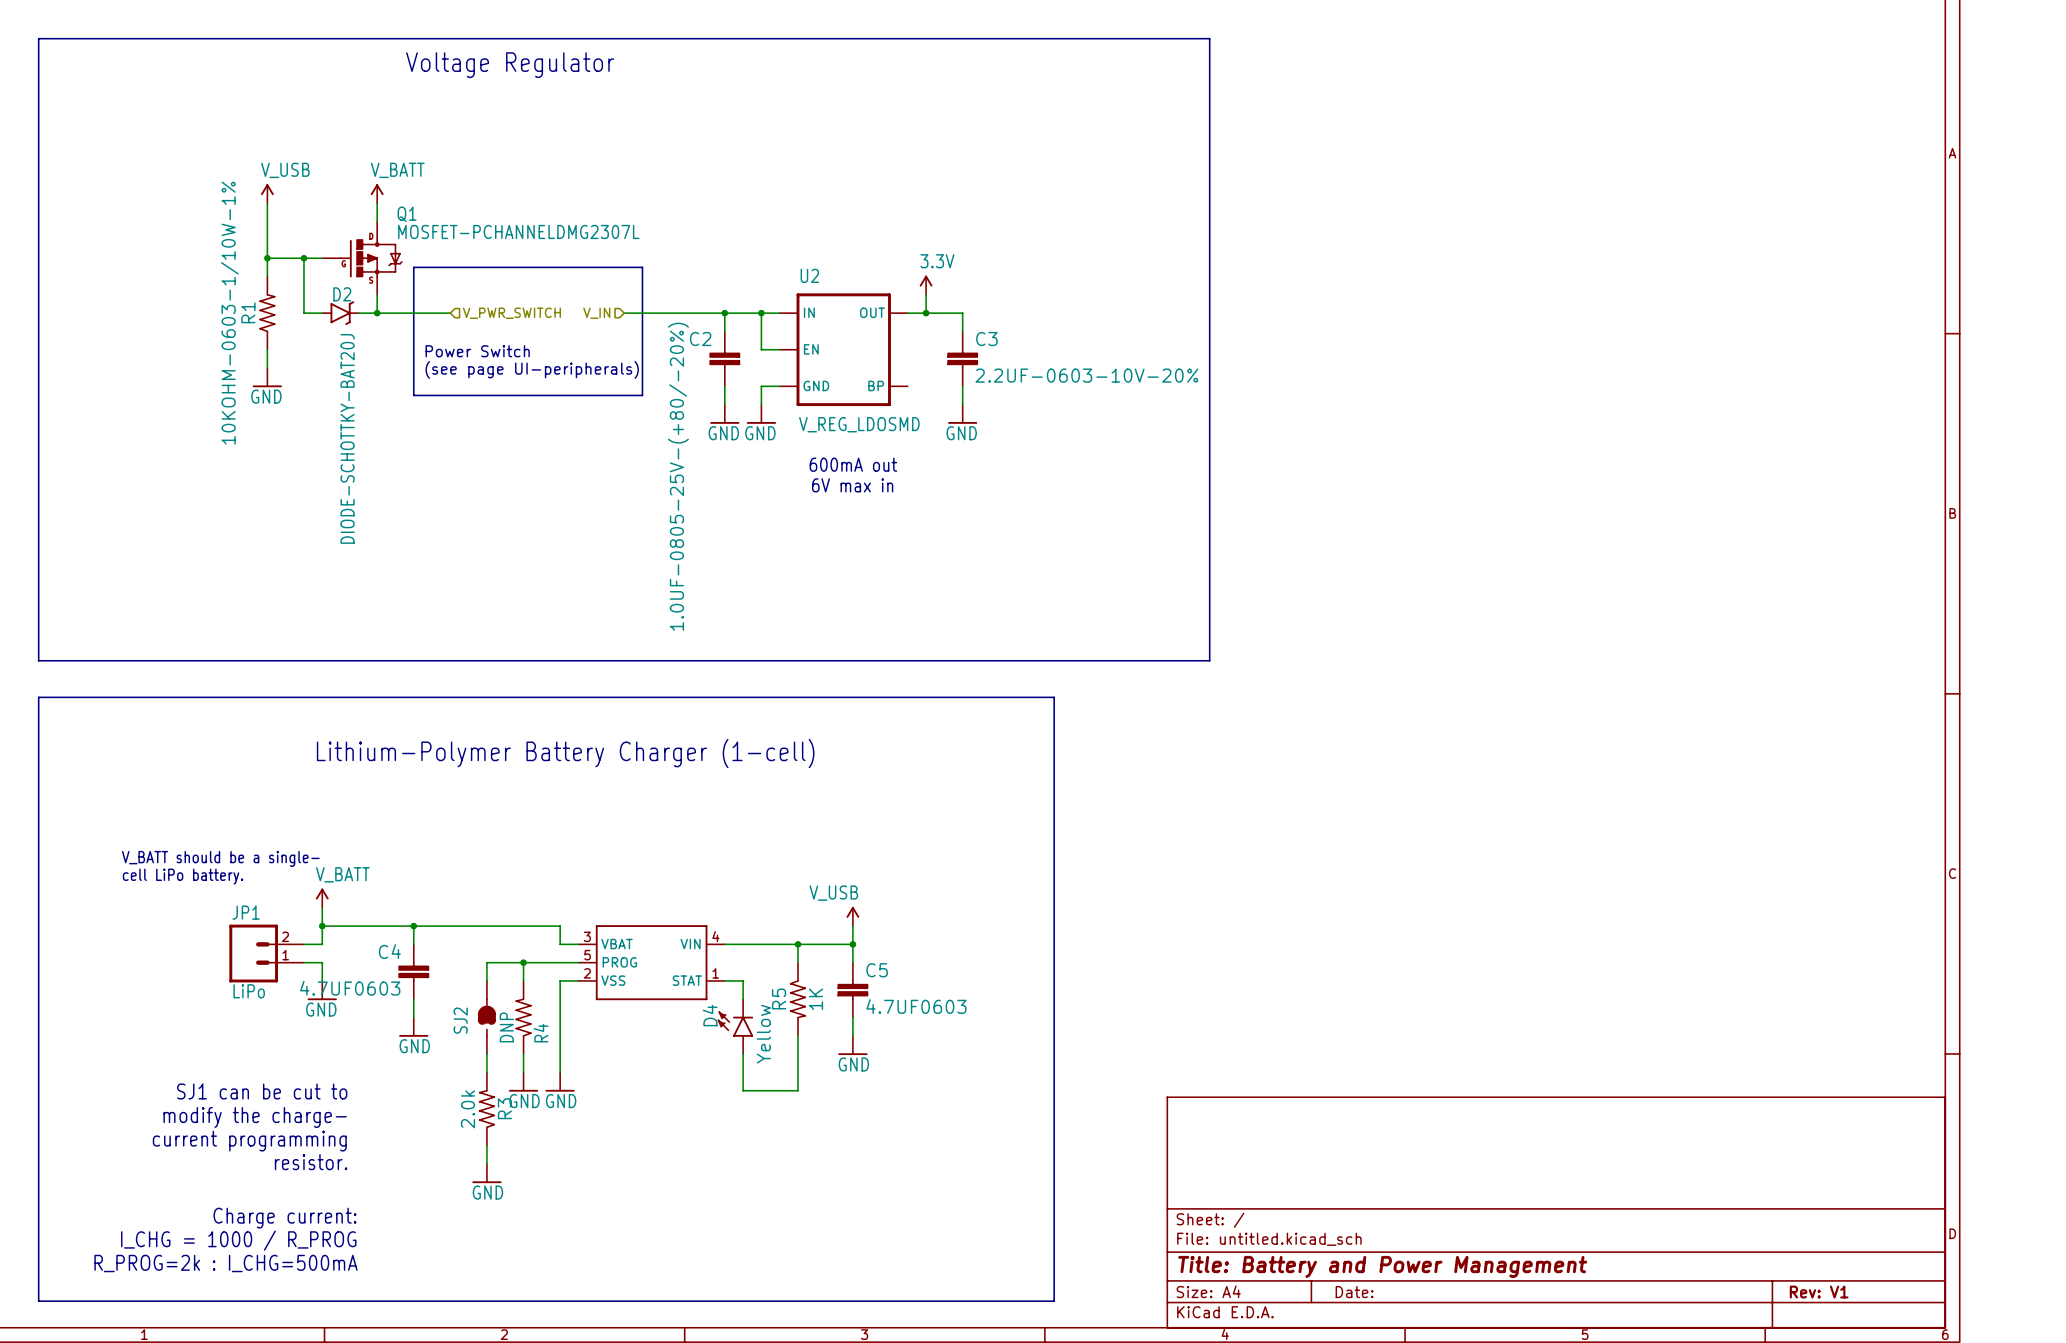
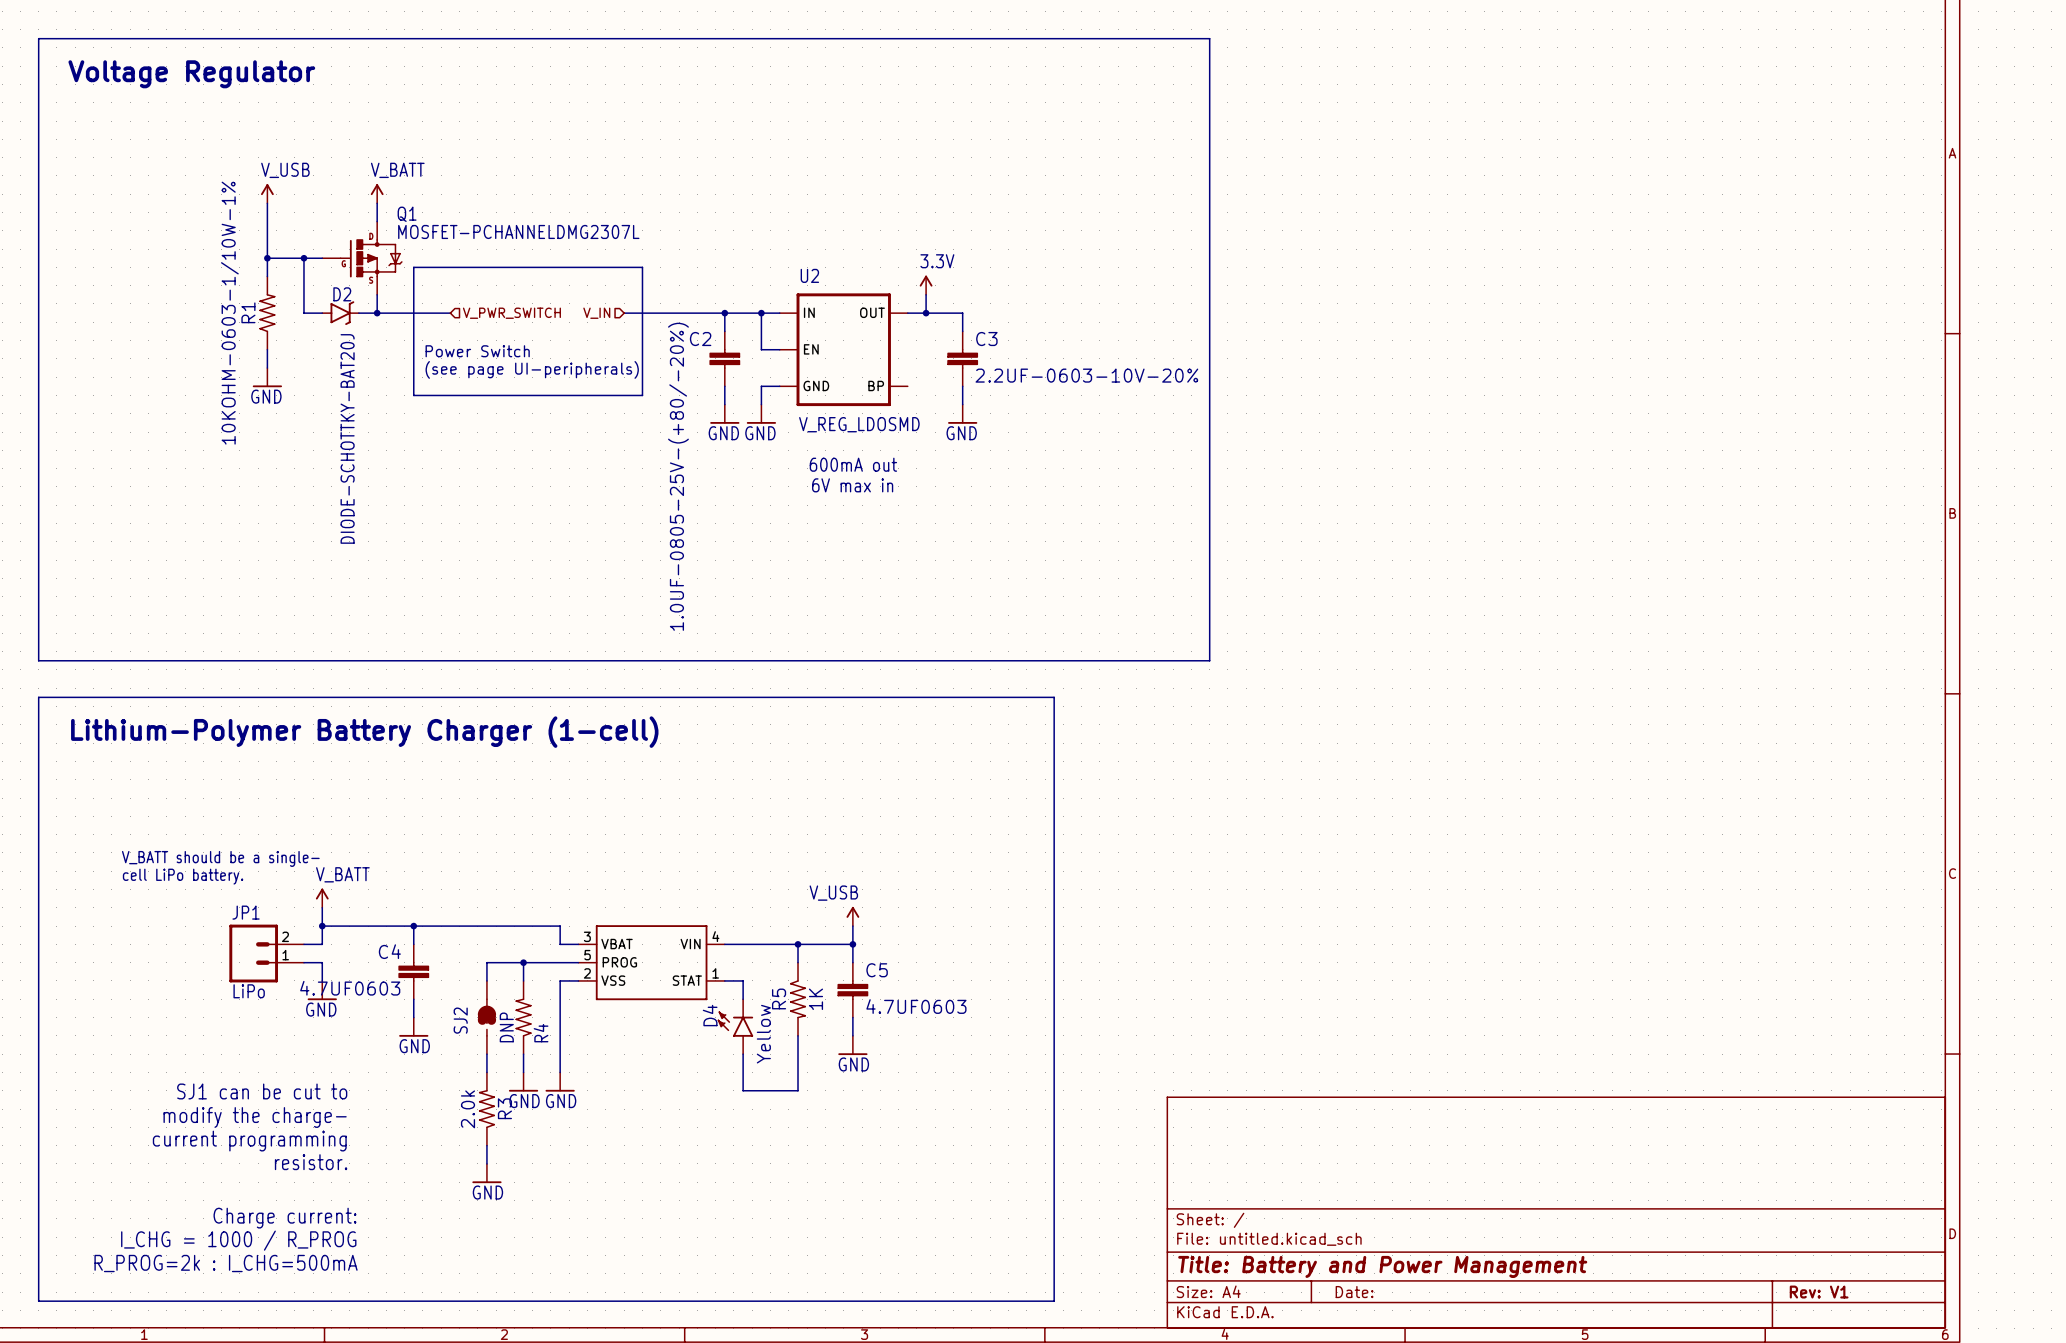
text: Voltage Regulator (510, 65) -> none
text: none -> Voltage Regulator (191, 74)
text: none -> Lithium-Polymer Battery Charger (1-cell) (364, 732)
text: Lithium-Polymer Battery Charger (1-cell) (565, 753) -> none

